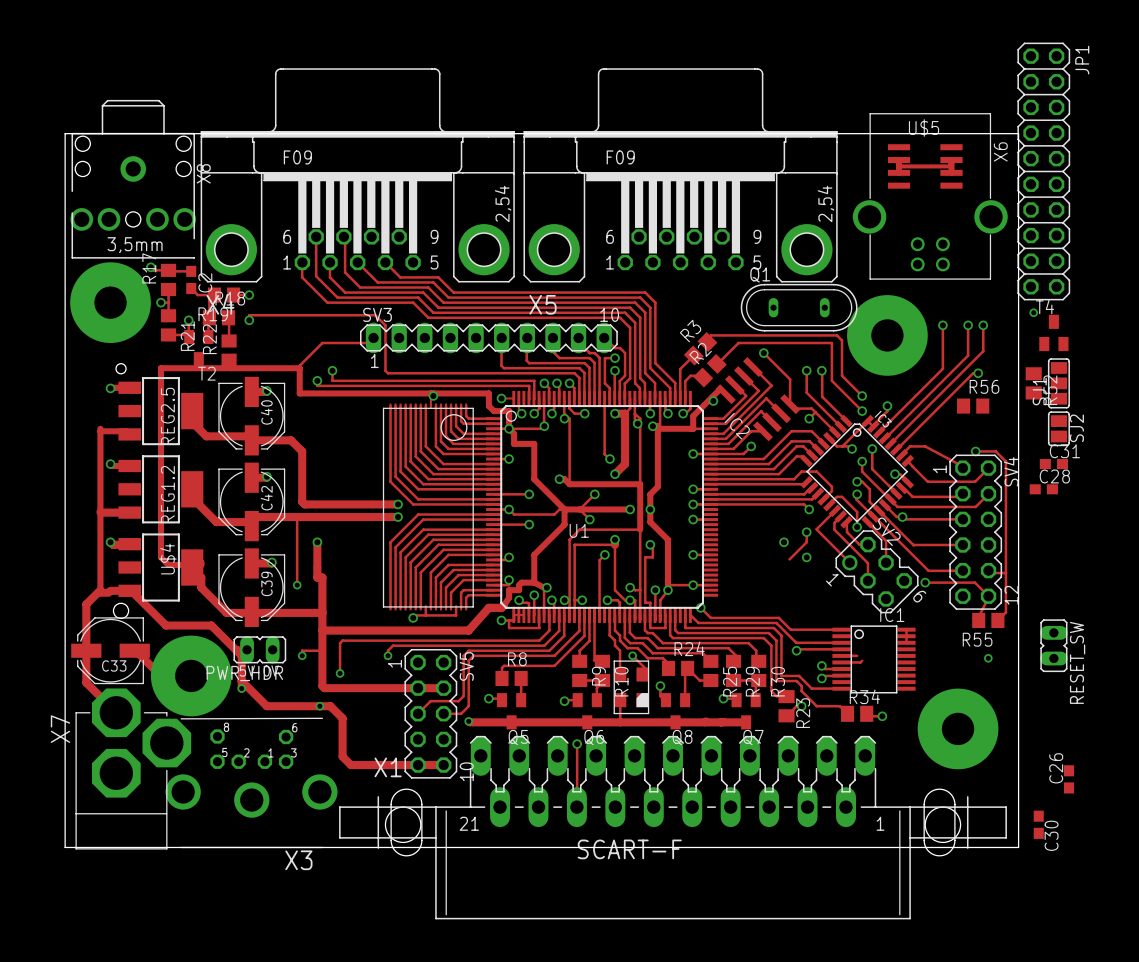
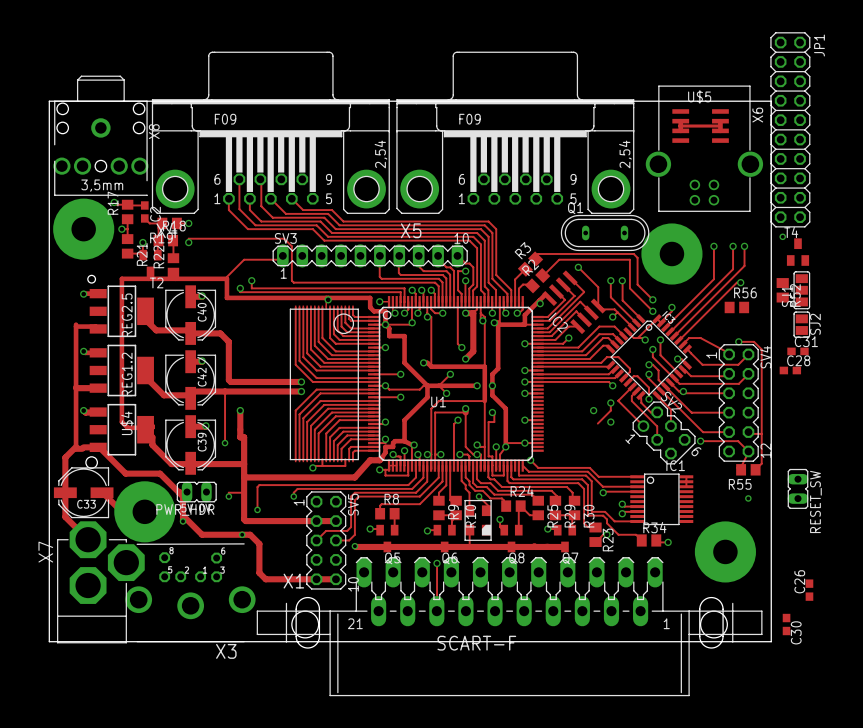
track: (841, 655) (857, 655) -> none
track: (862, 660) (860, 662) (841, 662) -> none

